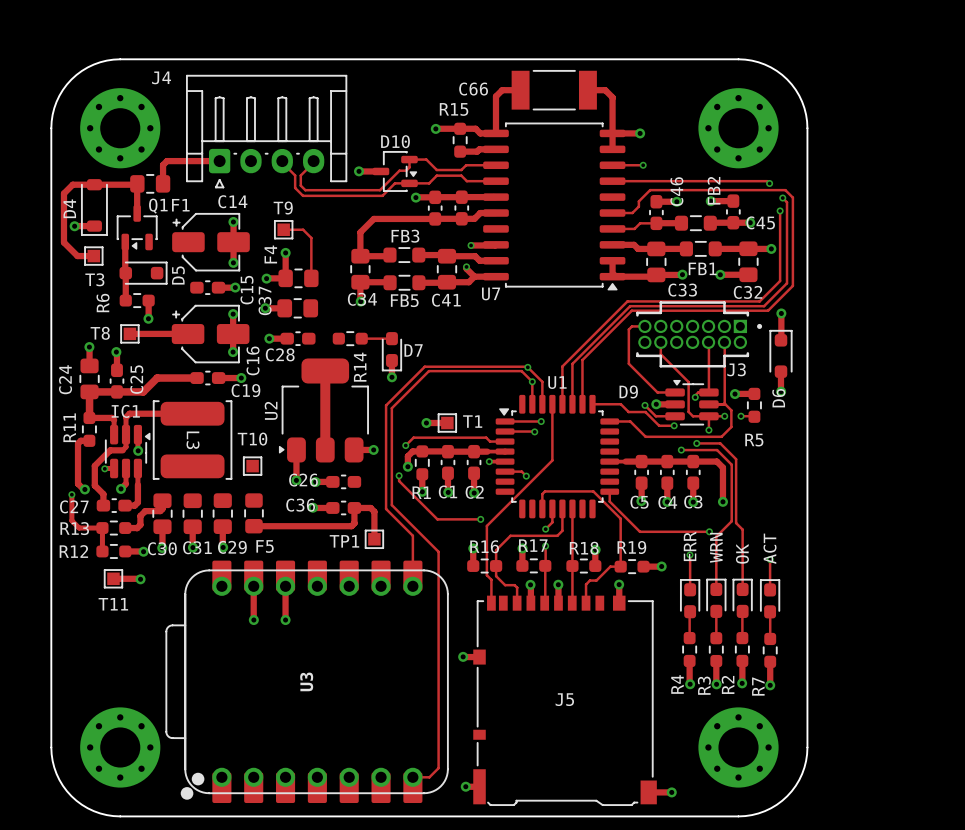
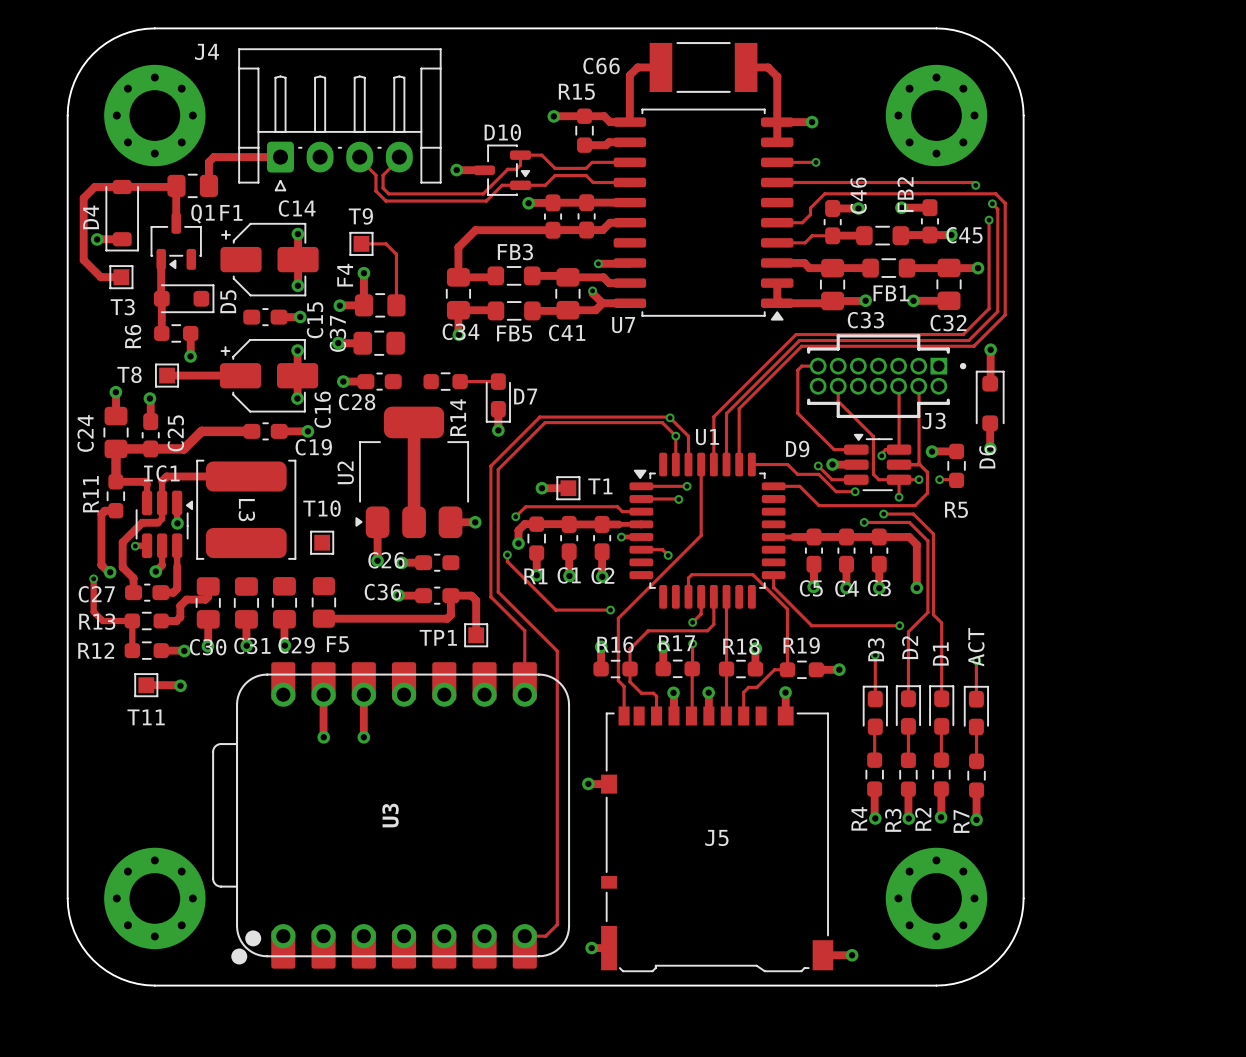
ERR name: ERR (690, 546) -> D3 (876, 649)
WRN name: WRN (716, 547) -> D2 (910, 647)
OK name: OK (742, 553) -> D1 (940, 653)

